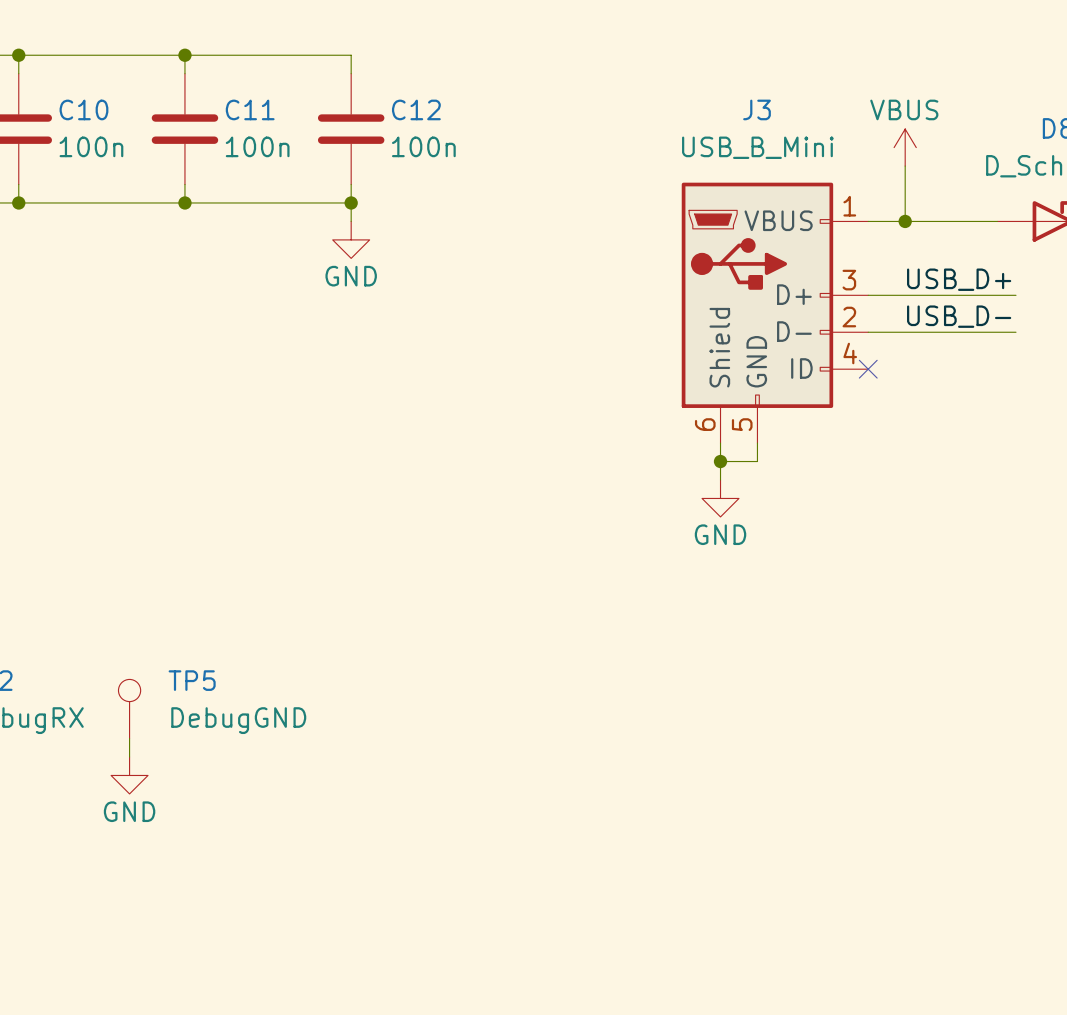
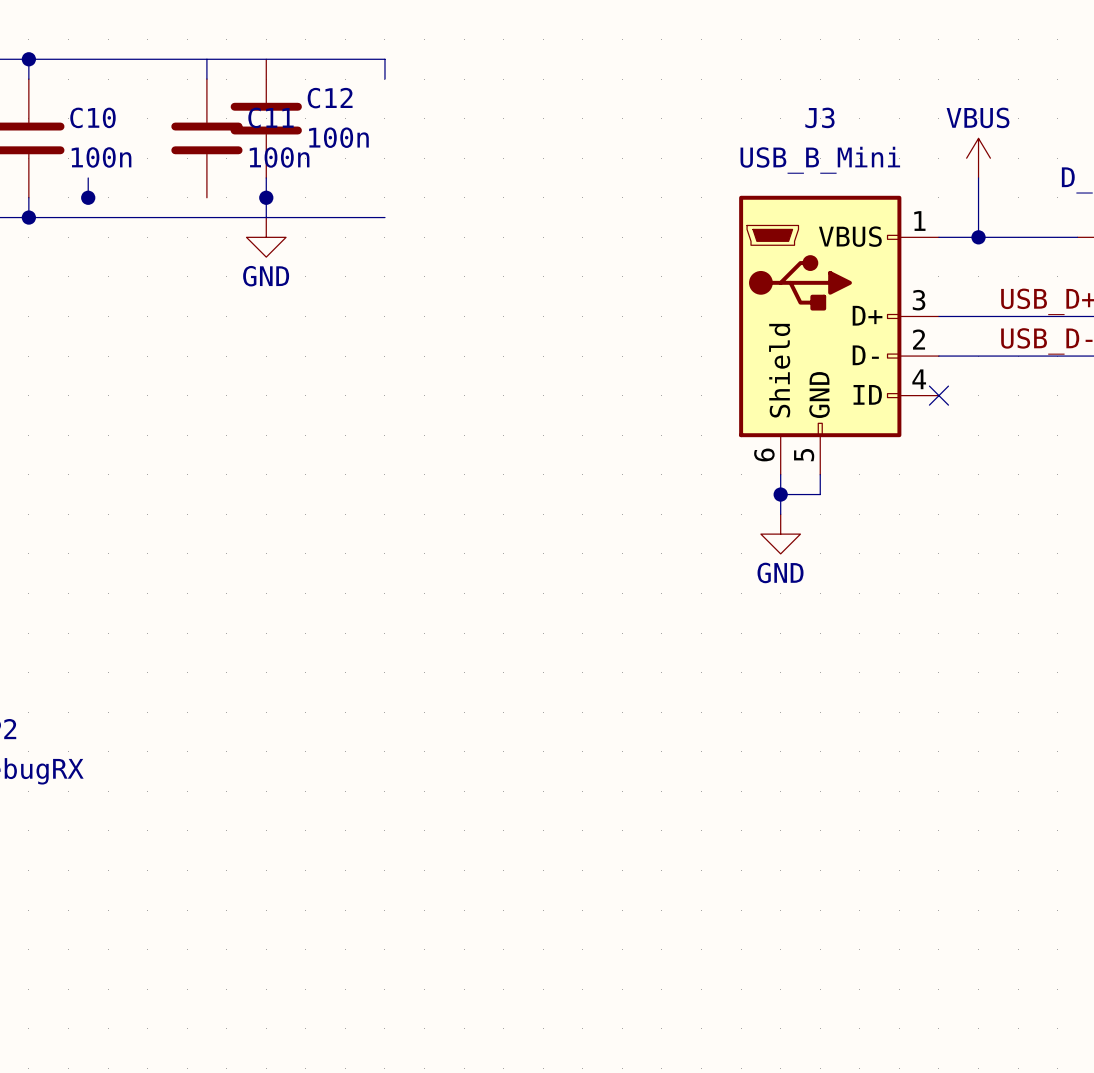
junction: (184, 55) -> none
C12 position: (351, 129) -> (266, 118)
junction: none -> (88, 197)
wire: (184, 184) (184, 202) -> (88, 177) (88, 197)
junction: none -> (266, 197)
wire: (351, 184) (351, 221) -> (266, 177) (266, 217)
junction: (184, 202) -> none
junction: (351, 202) -> none
power symbol position: GND (351, 239) -> GND (266, 237)
TP5: DebugGND (129, 708) -> none
wire: (129, 738) (129, 757) -> none
power symbol: GND (129, 775) -> none

